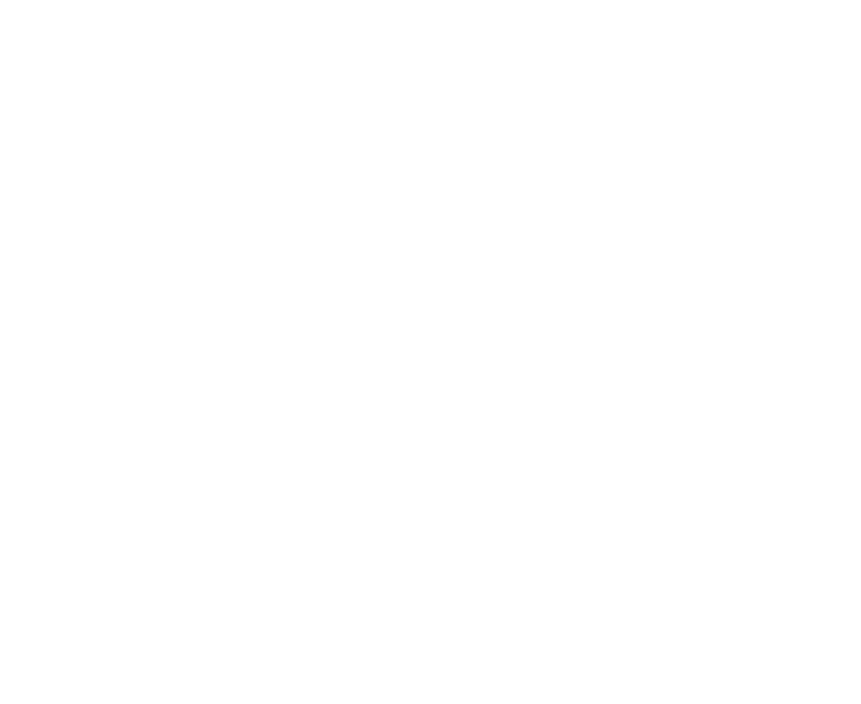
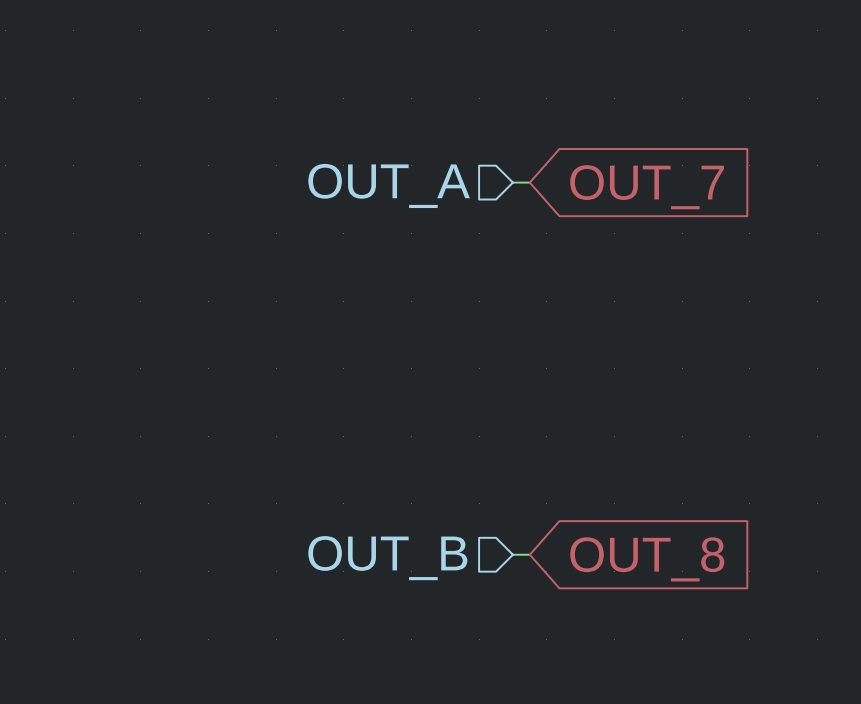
sheet pin: none -> OUT_A (389, 185)
wire: none -> (512, 182) (529, 182)
global label: none -> OUT_7 (647, 187)
wire: none -> (512, 554) (529, 554)
sheet pin: none -> OUT_B (387, 558)
global label: none -> OUT_8 (647, 559)

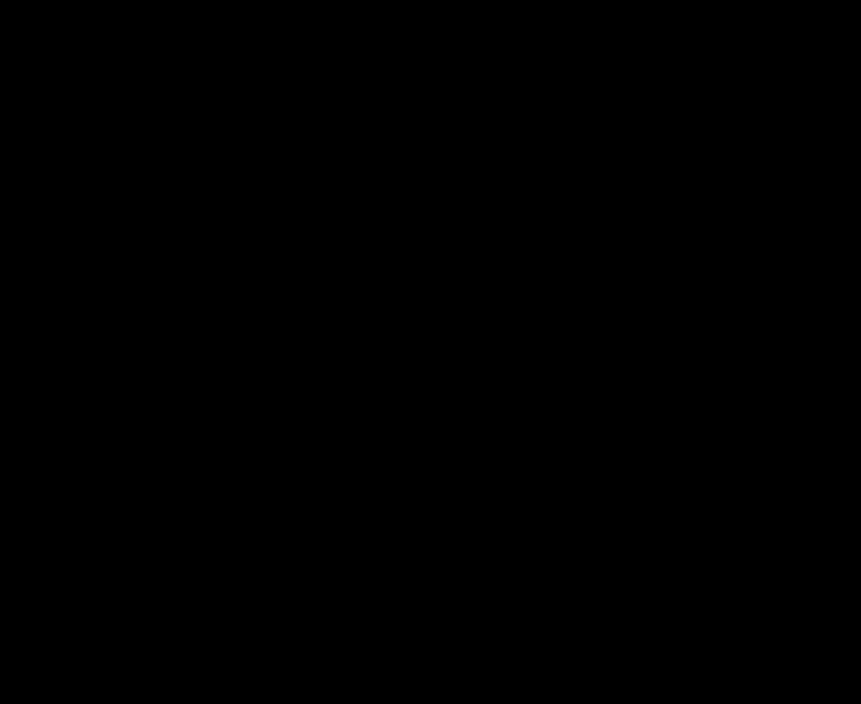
wire: (512, 182) (529, 182) -> none
sheet pin: OUT_A (389, 185) -> none
global label: OUT_7 (647, 187) -> none
wire: (512, 554) (529, 554) -> none
sheet pin: OUT_B (387, 558) -> none
global label: OUT_8 (647, 559) -> none

